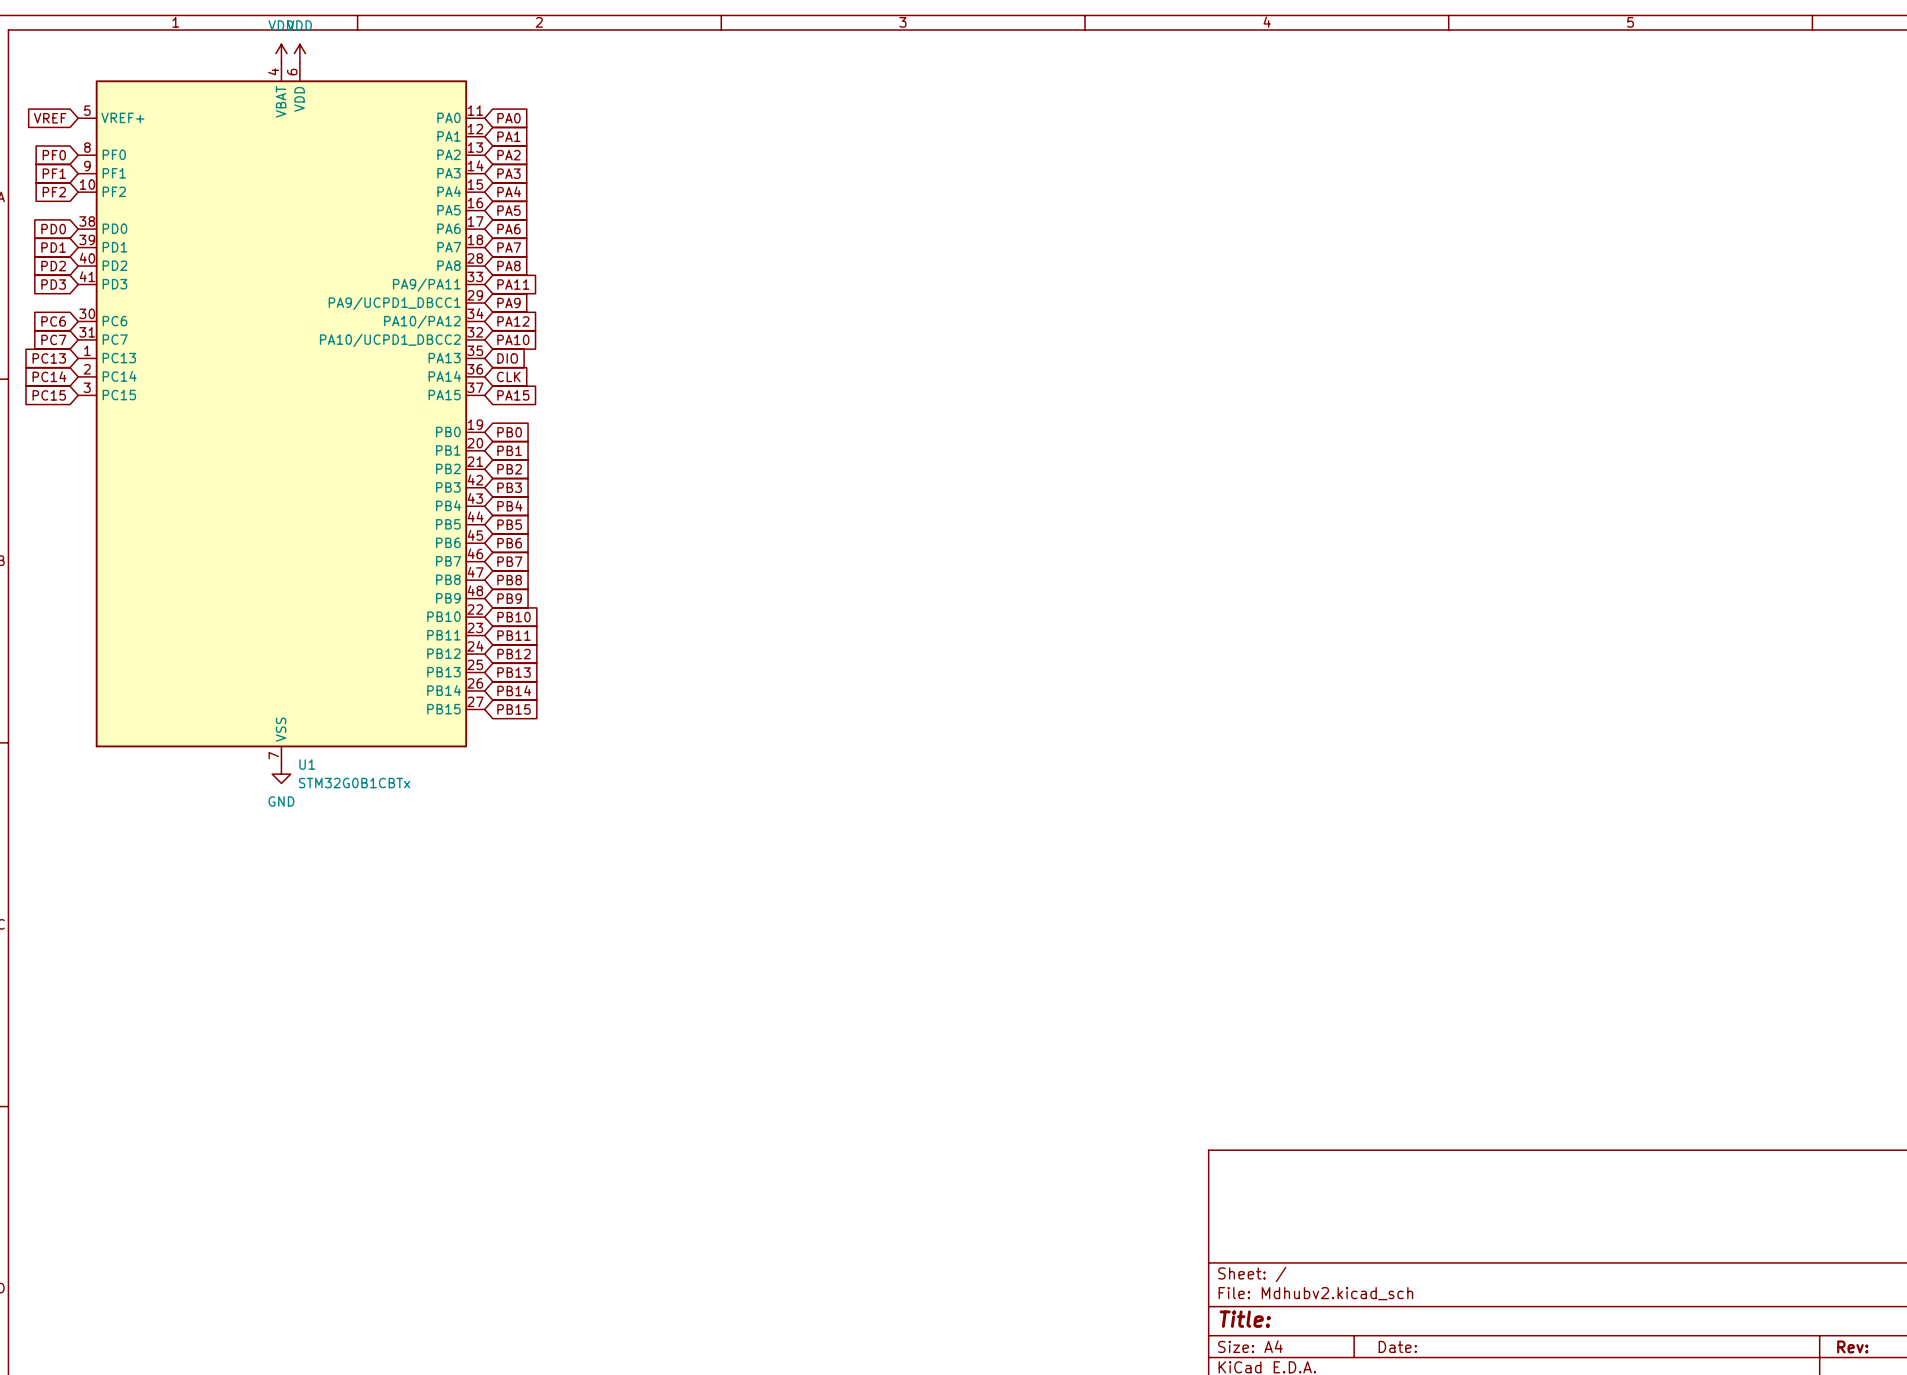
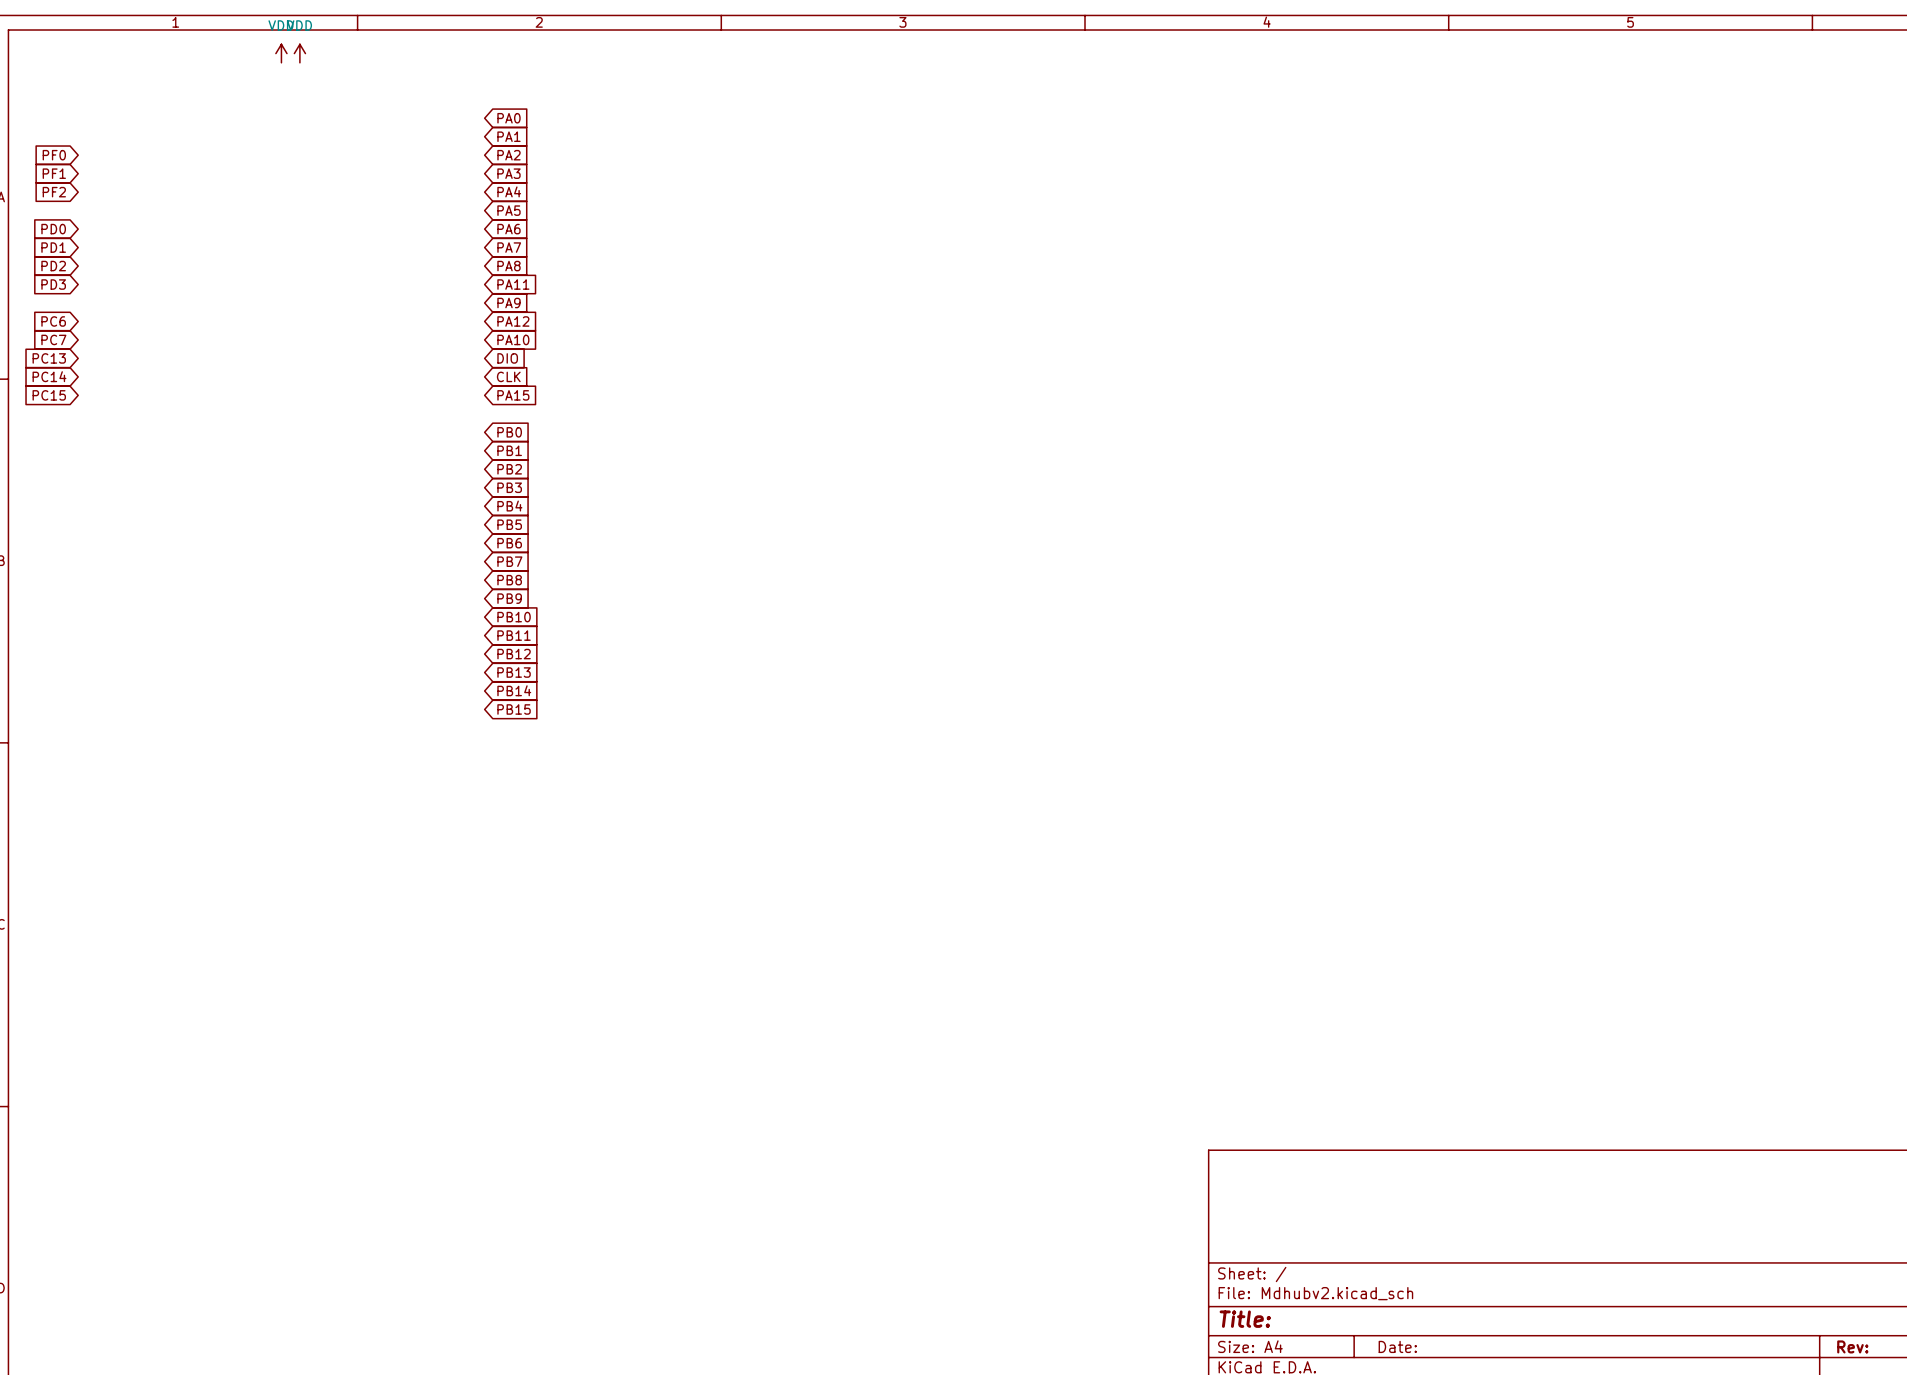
global label: VREF (50, 118) -> none
U1: STM32G0B1CBTx (281, 413) -> none
power symbol: GND (281, 774) -> none

